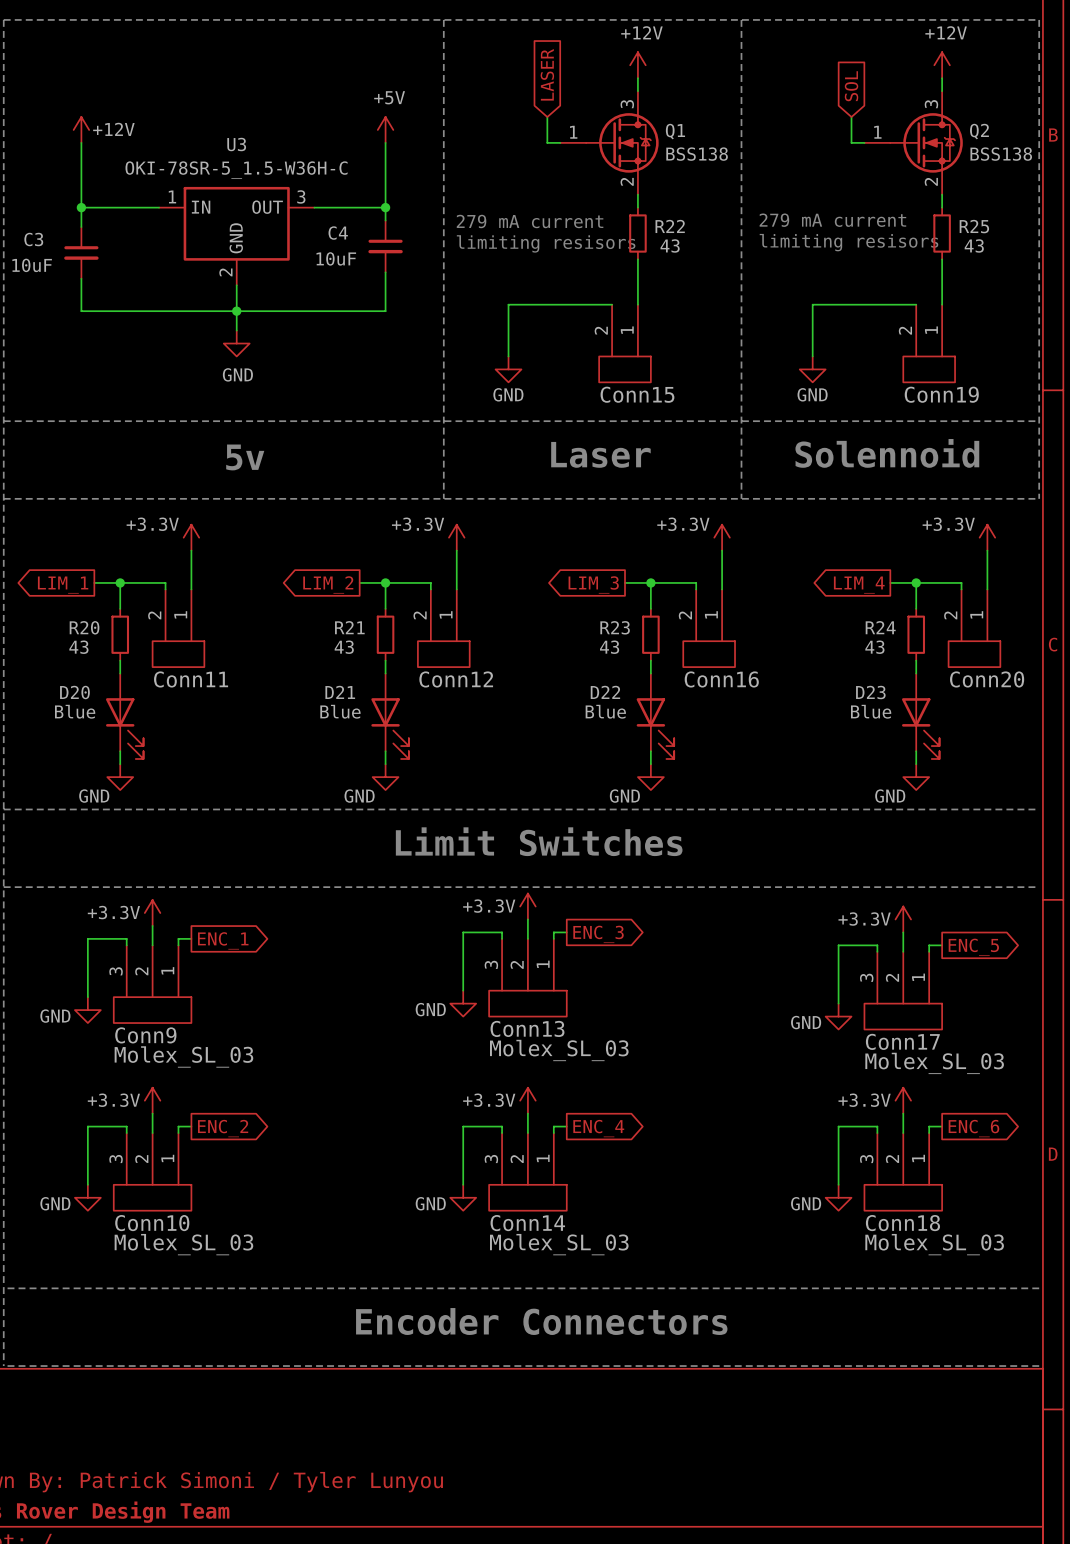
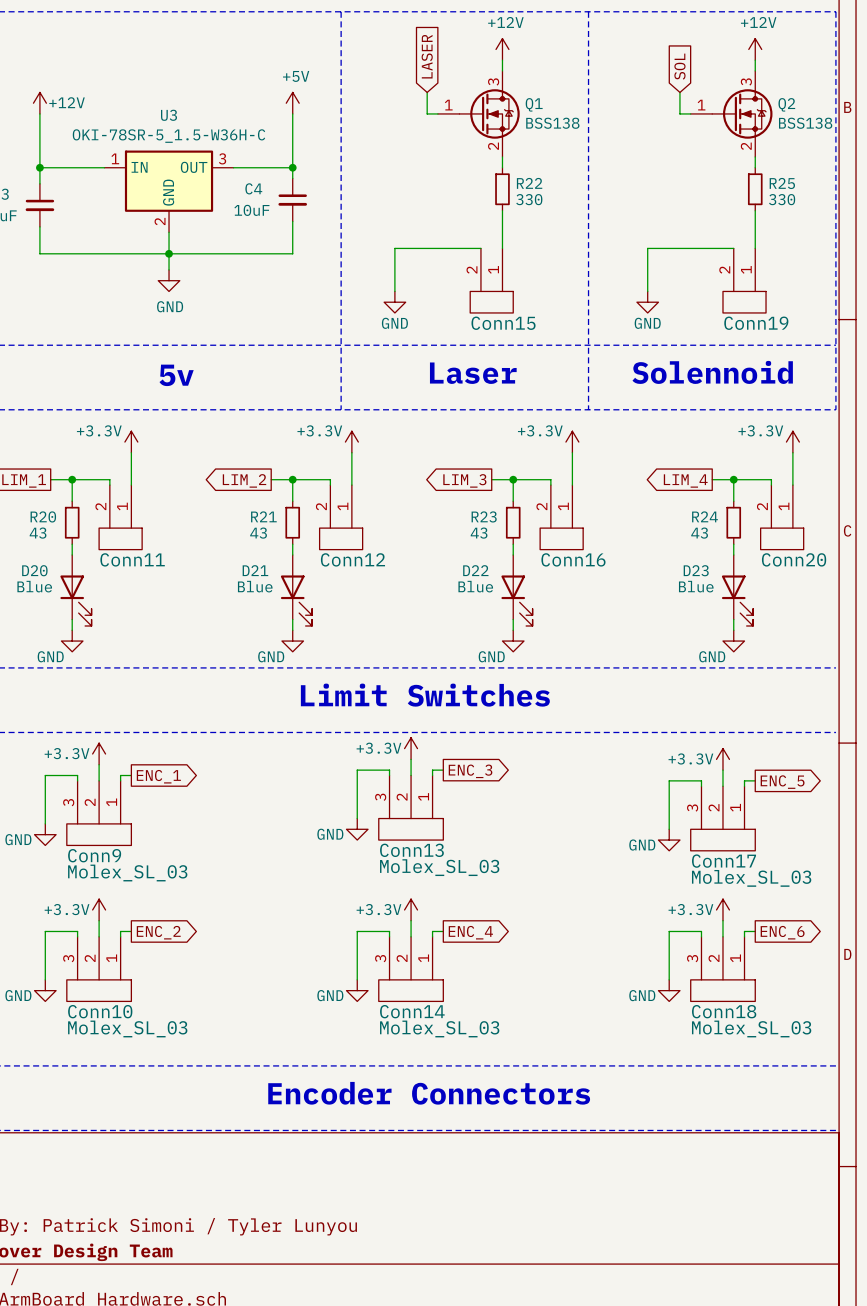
text: 279 mA current (832, 220) -> none
text: 279 mA current (530, 221) -> none
text: limiting resisors (848, 242) -> none
text: limiting resisors (546, 243) -> none
R22 value: 43 (670, 245) -> 330 (529, 199)
R25 value: 43 (974, 245) -> 330 (782, 199)

